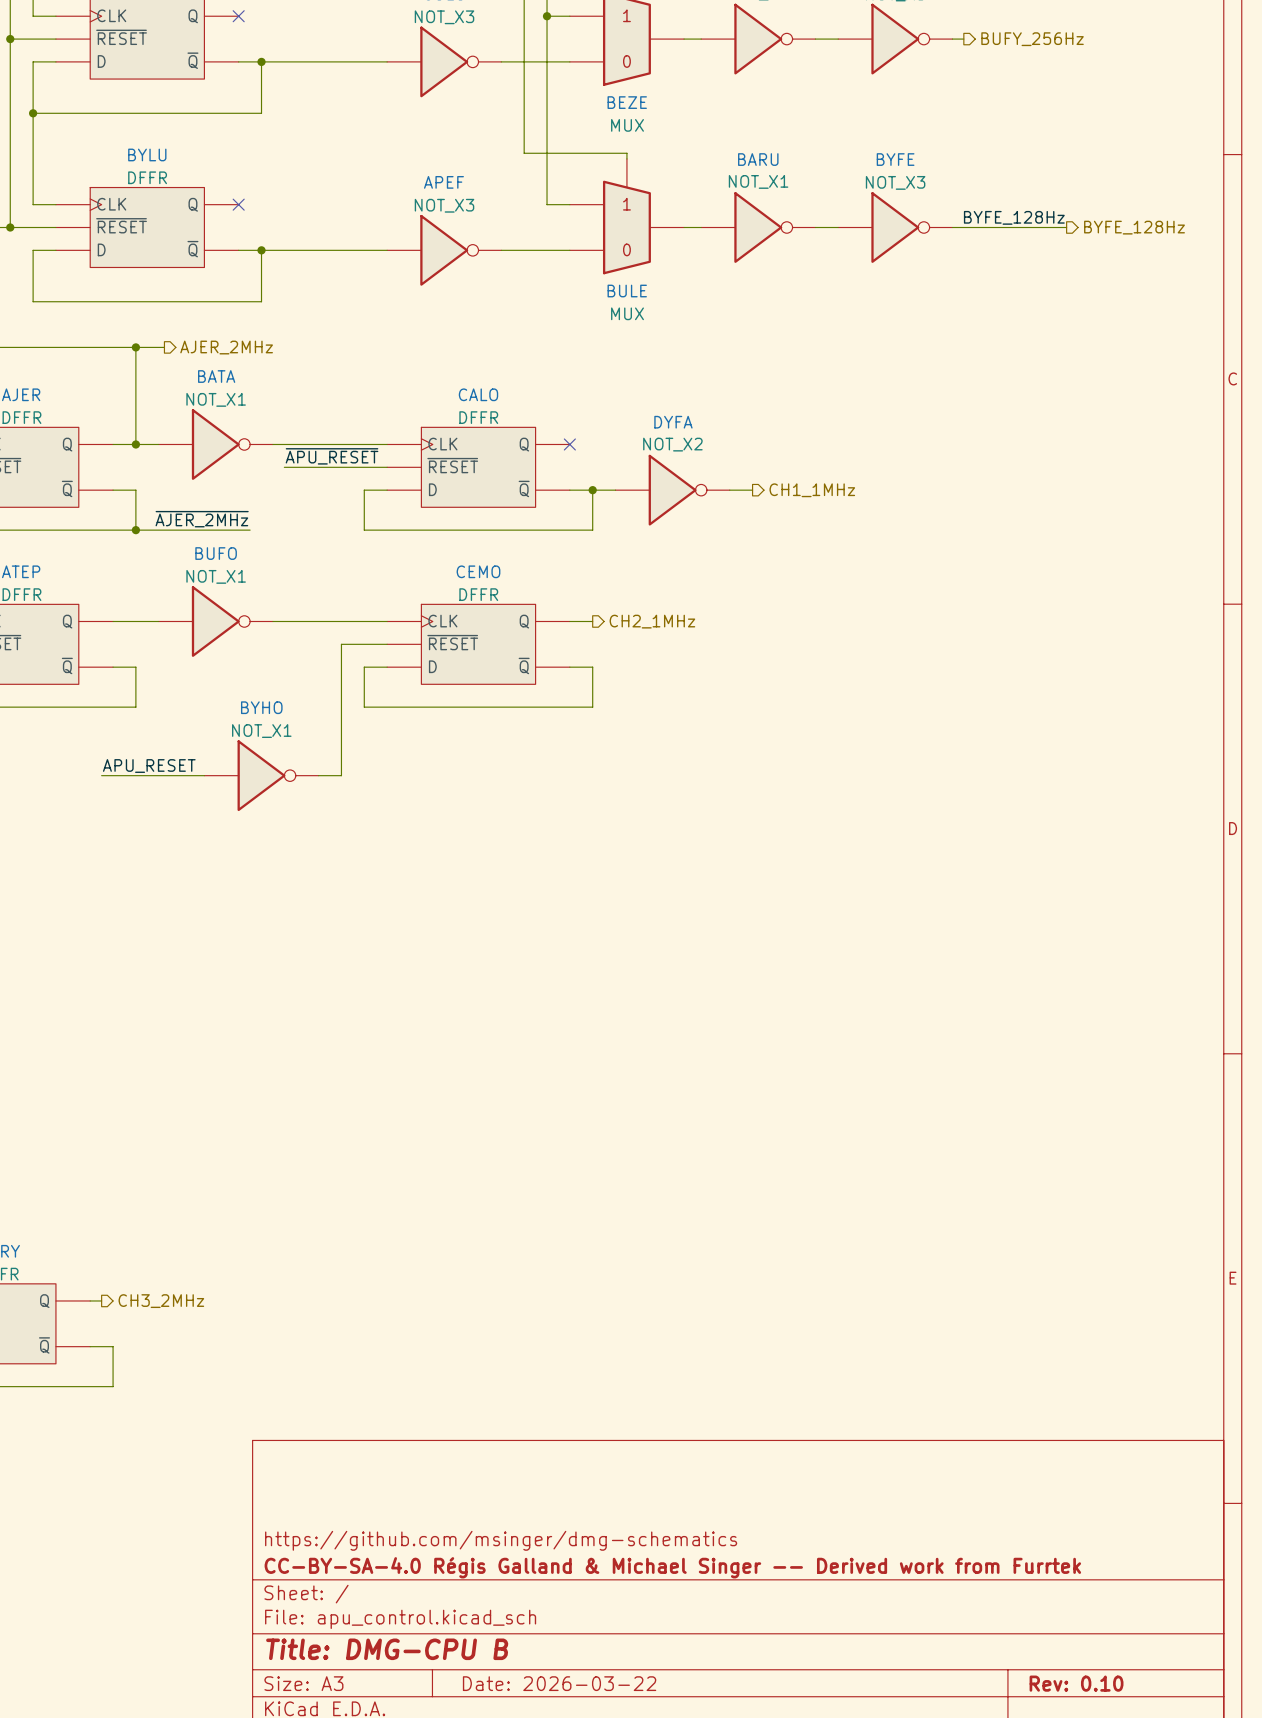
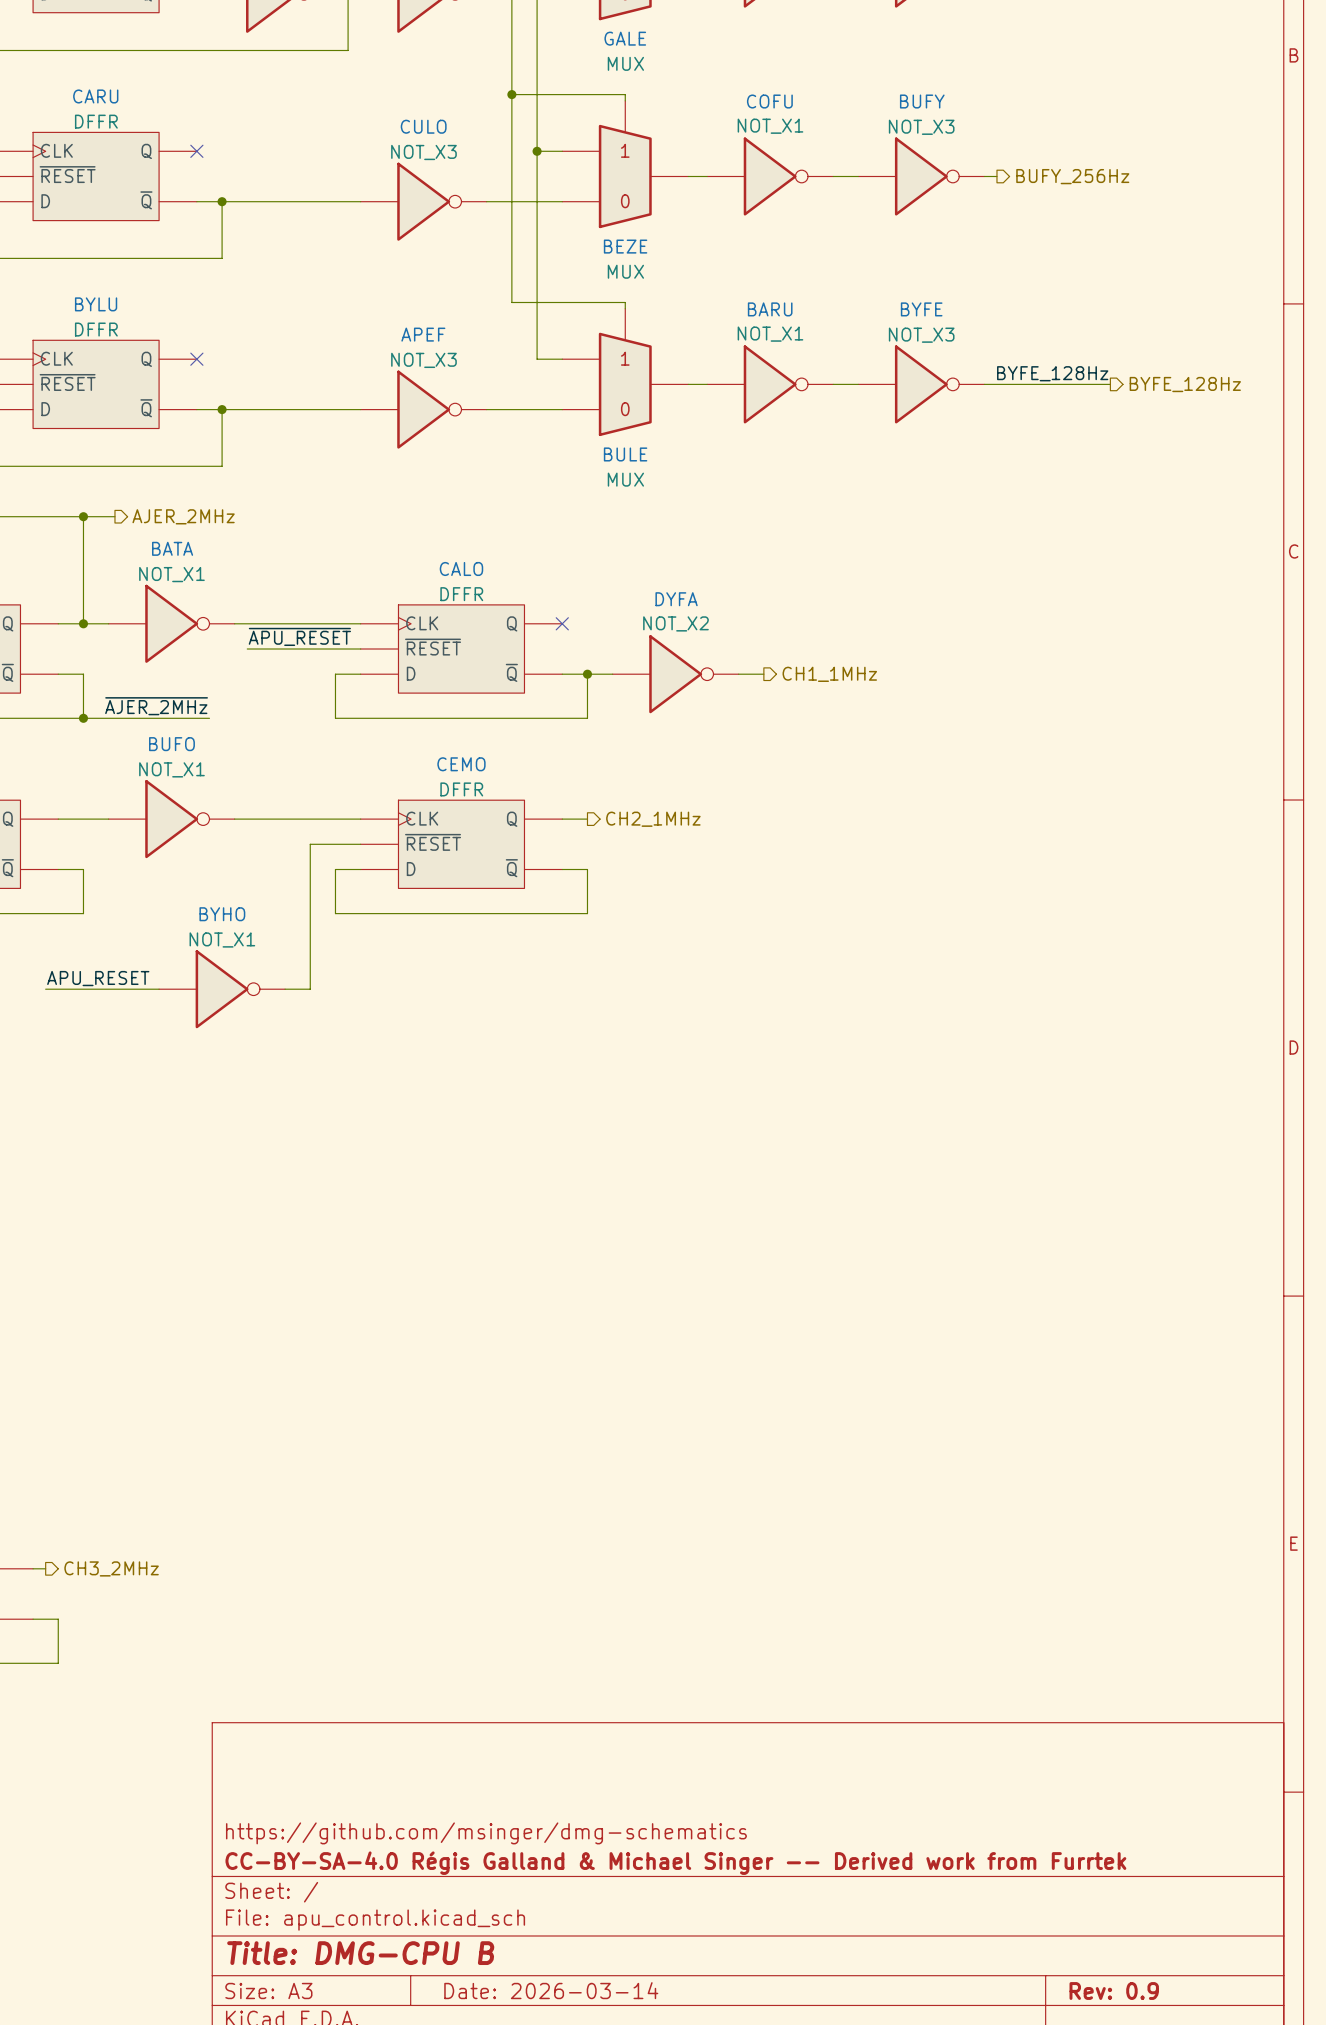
title block: Date: 2026-03-22 (559, 1683) -> Date: 2026-03-14 (551, 1990)
title block: Rev: 0.10 (1076, 1683) -> Rev: 0.9 (1114, 1991)

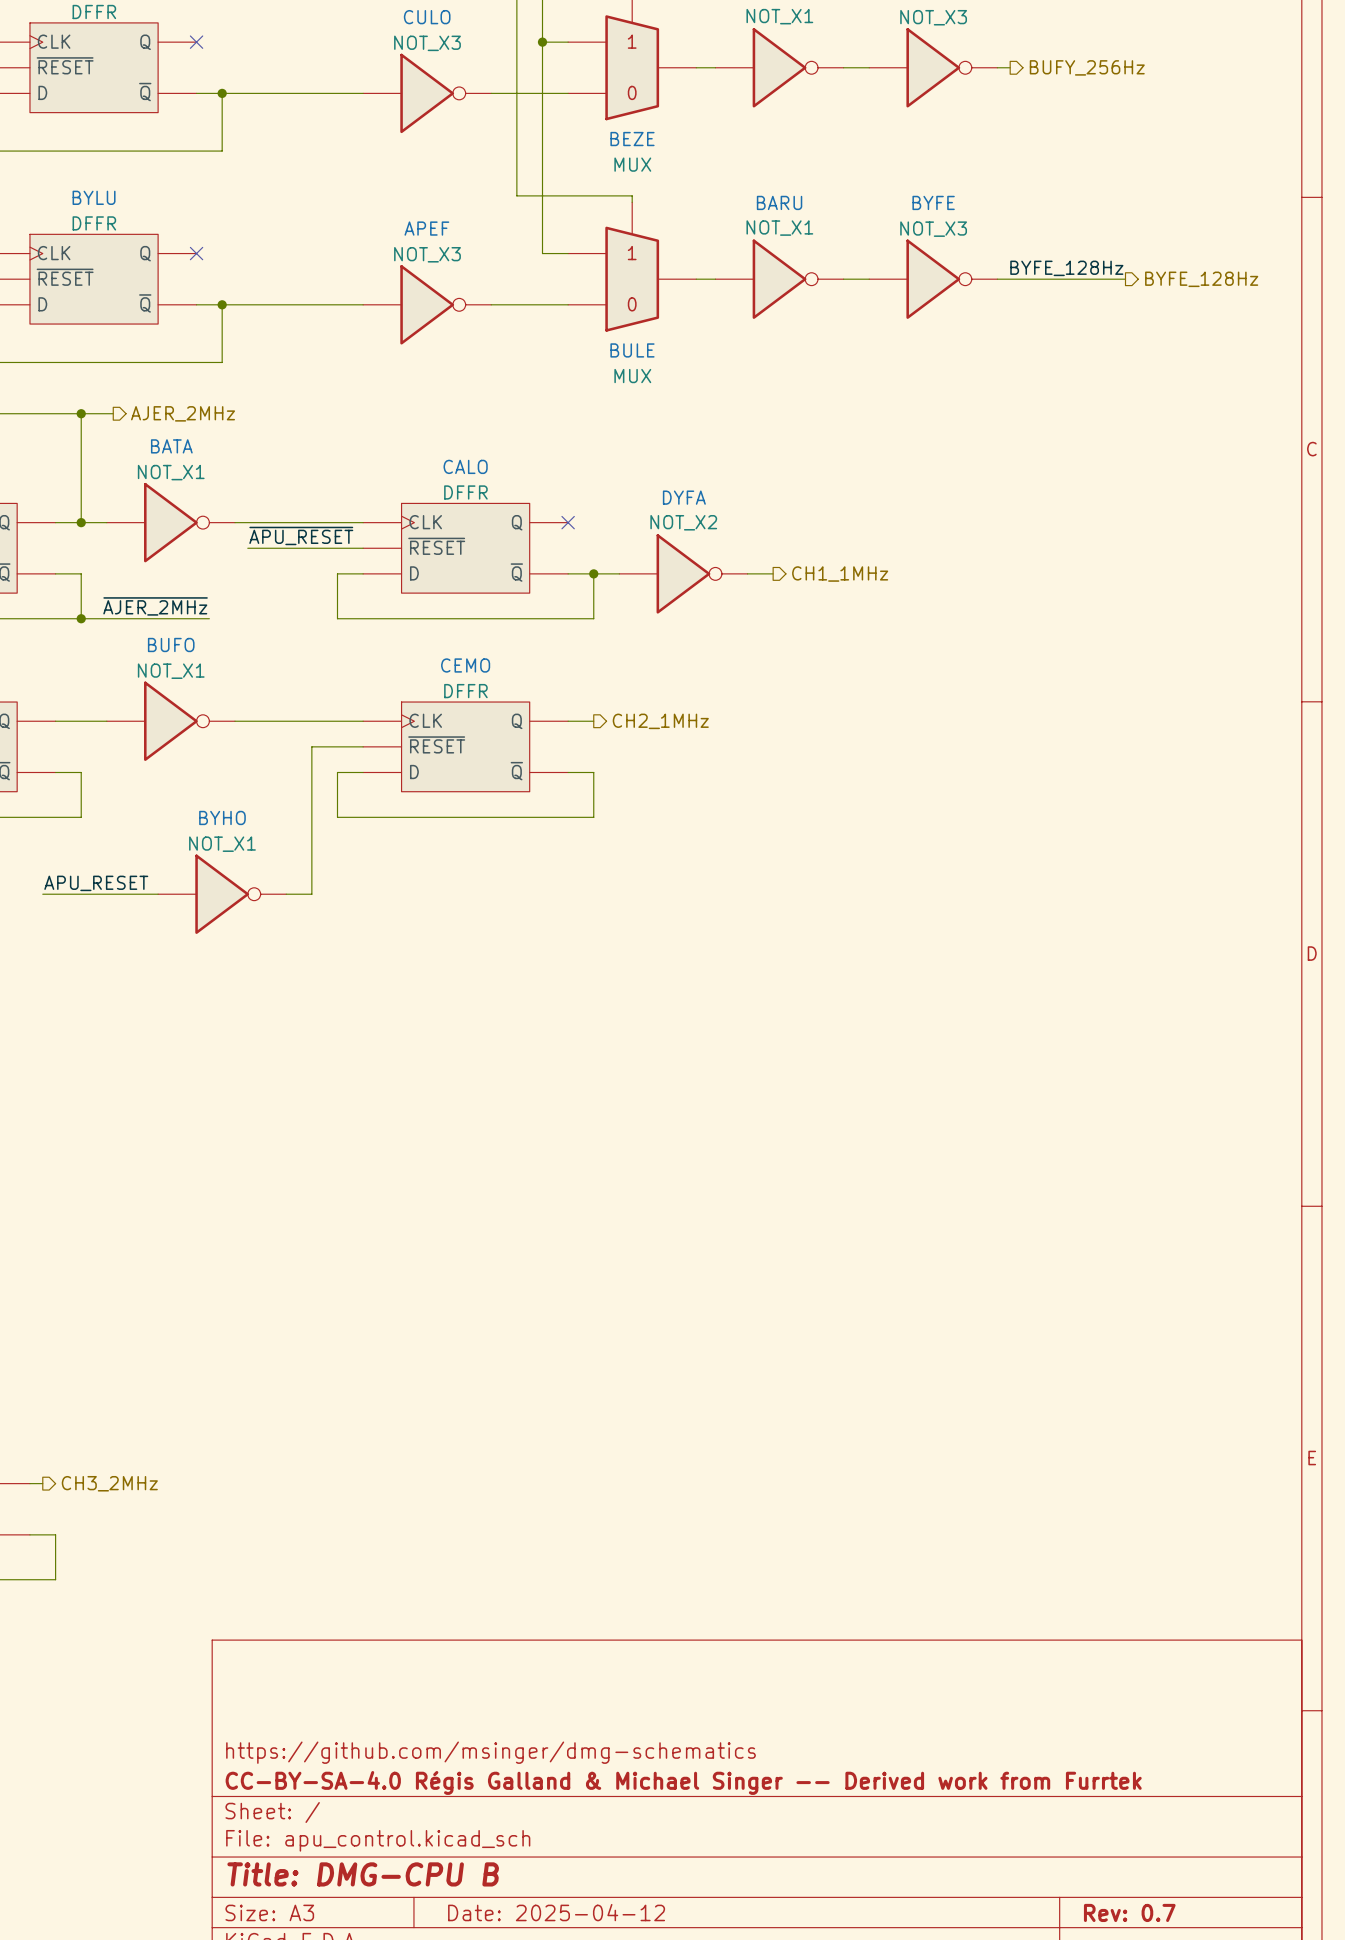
title block: Date: 2026-03-14 (551, 1990) -> Date: 2025-04-12 (556, 1912)
title block: Rev: 0.9 (1114, 1991) -> Rev: 0.7 (1129, 1912)

